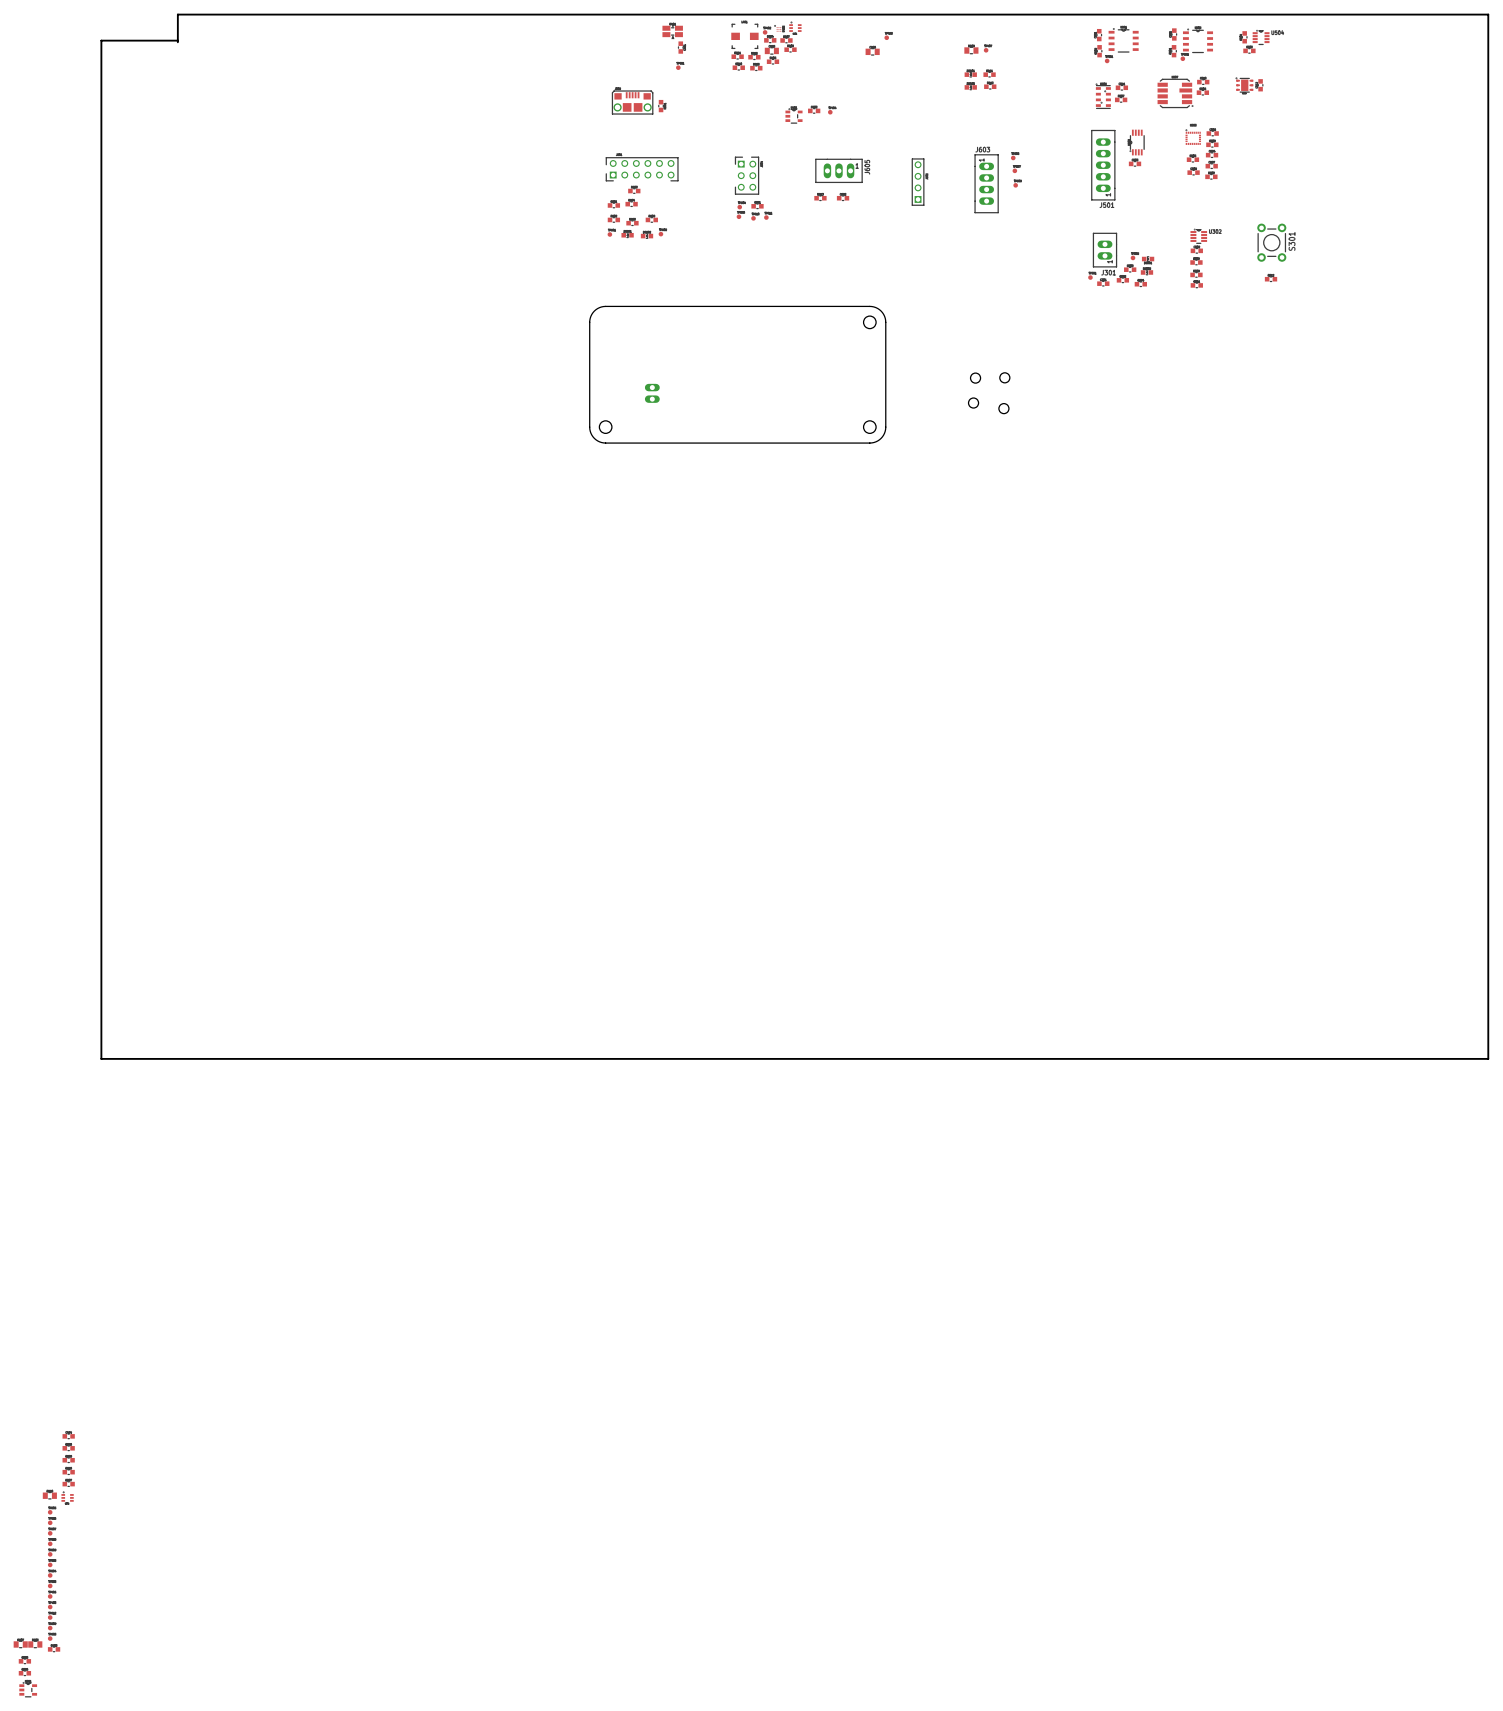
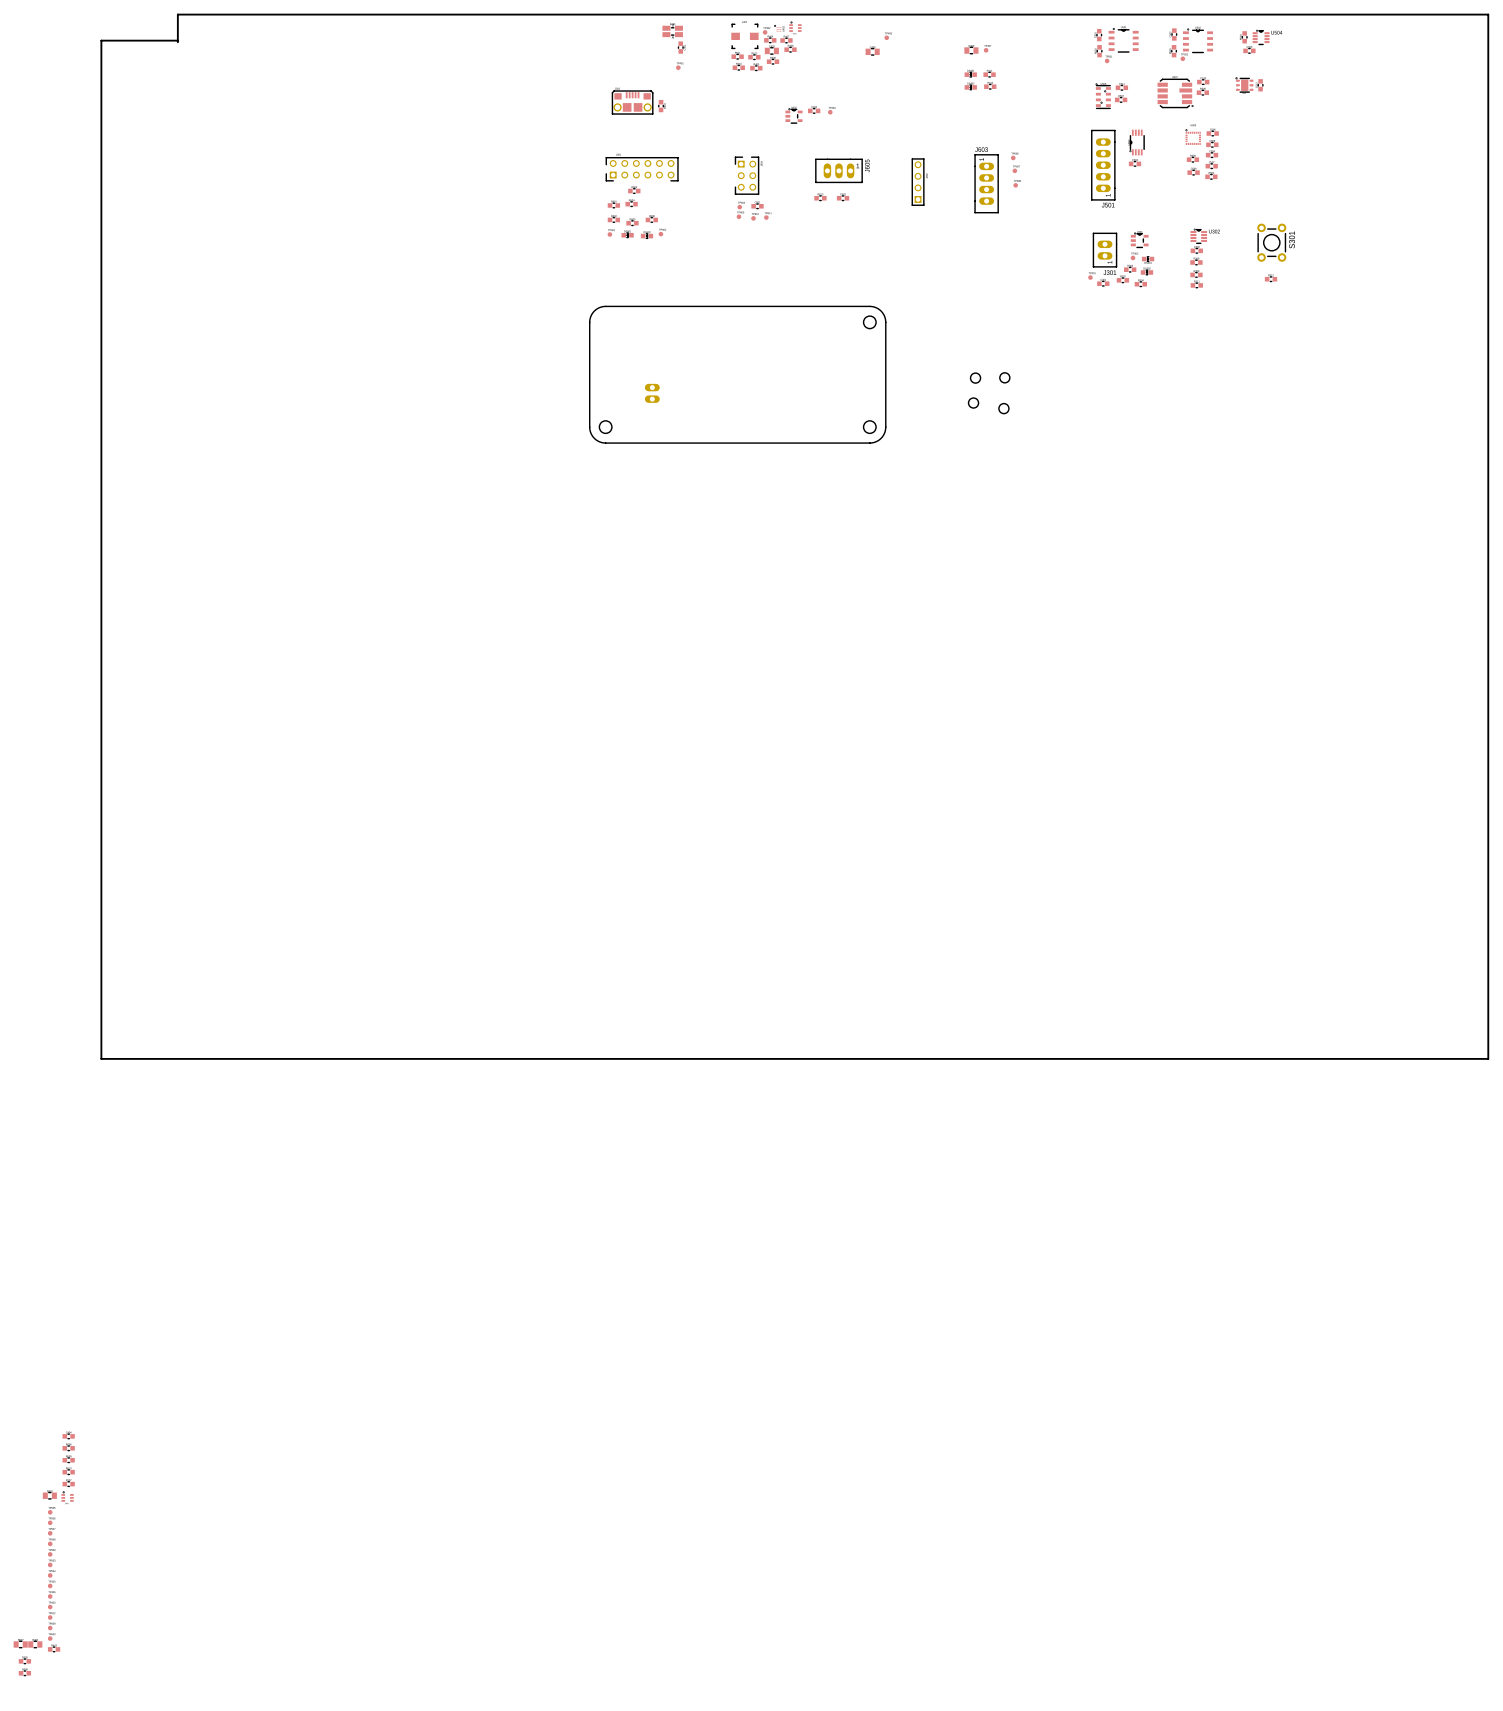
part position: (28, 1689) -> (1139, 240)

